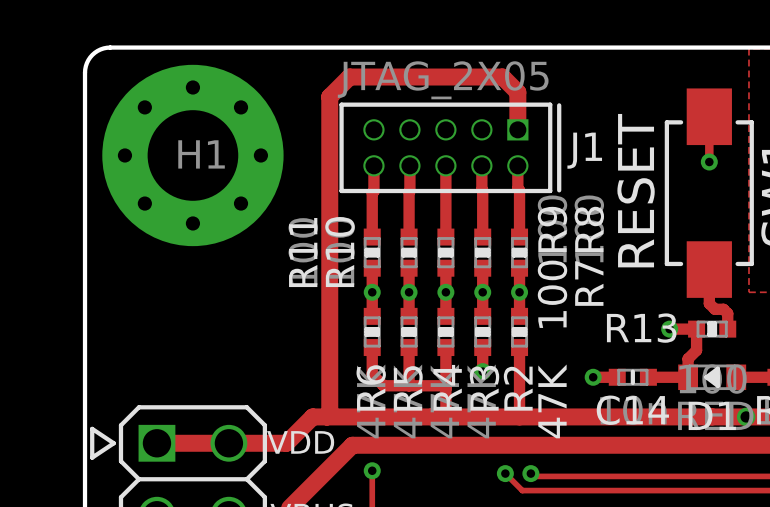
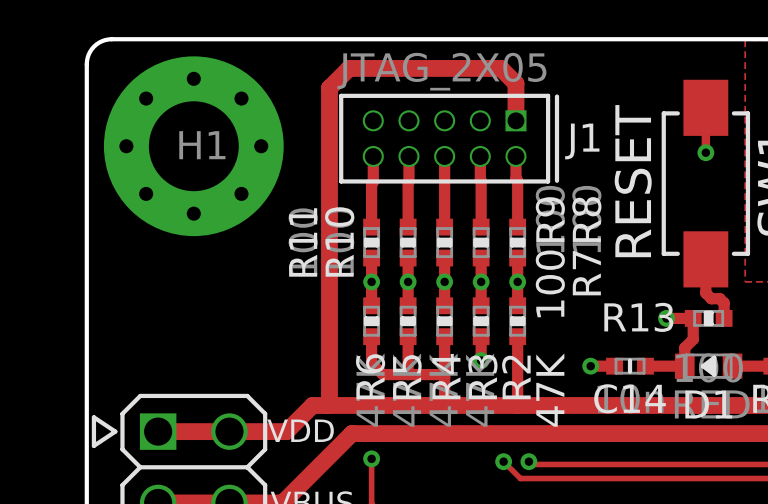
via: (746, 416) -> none

